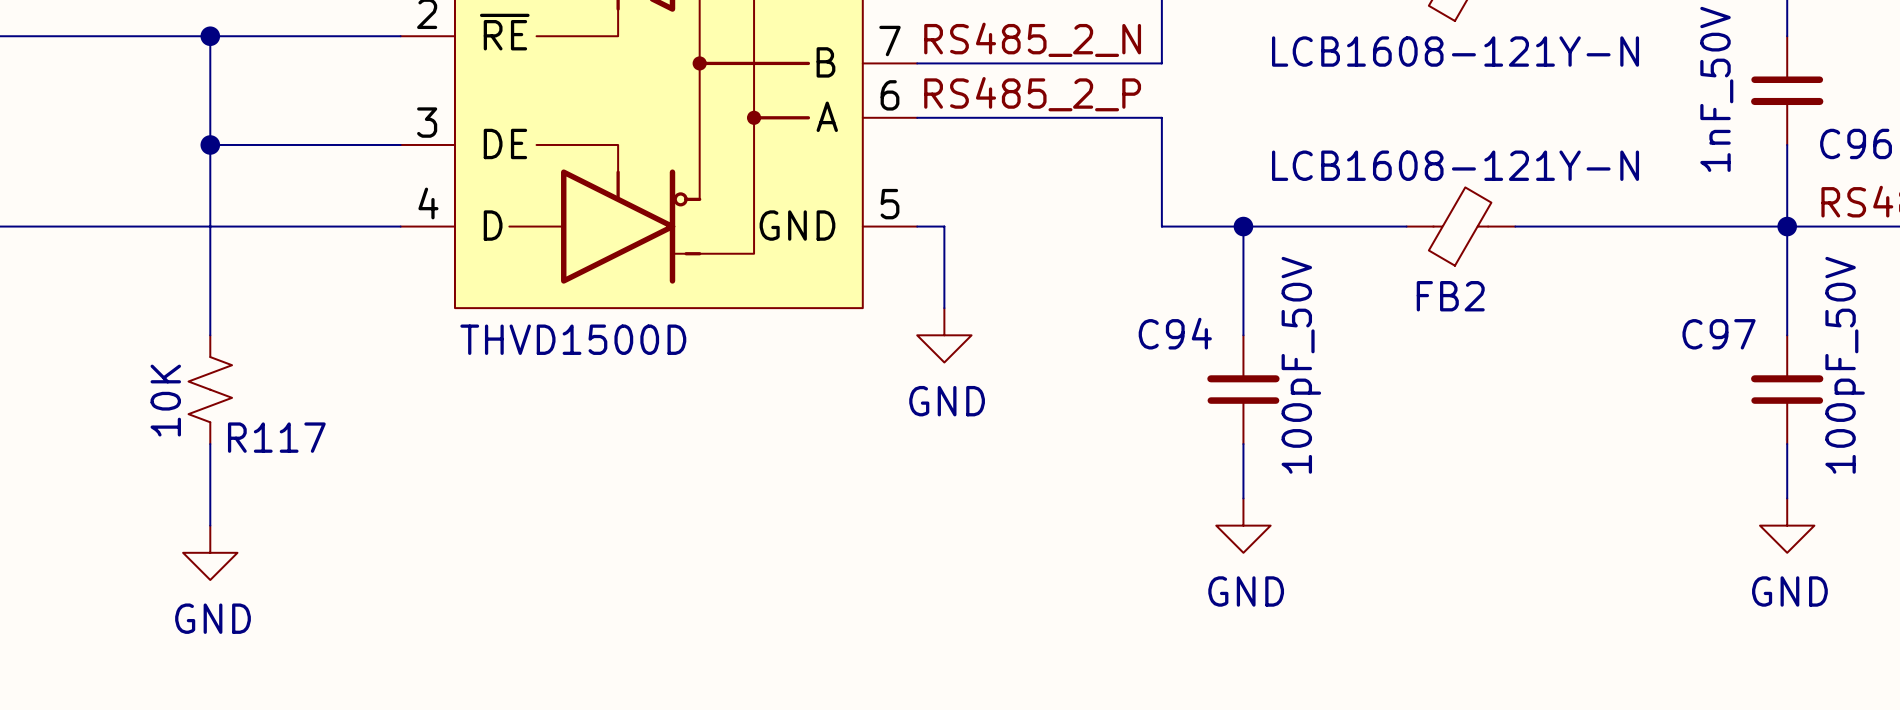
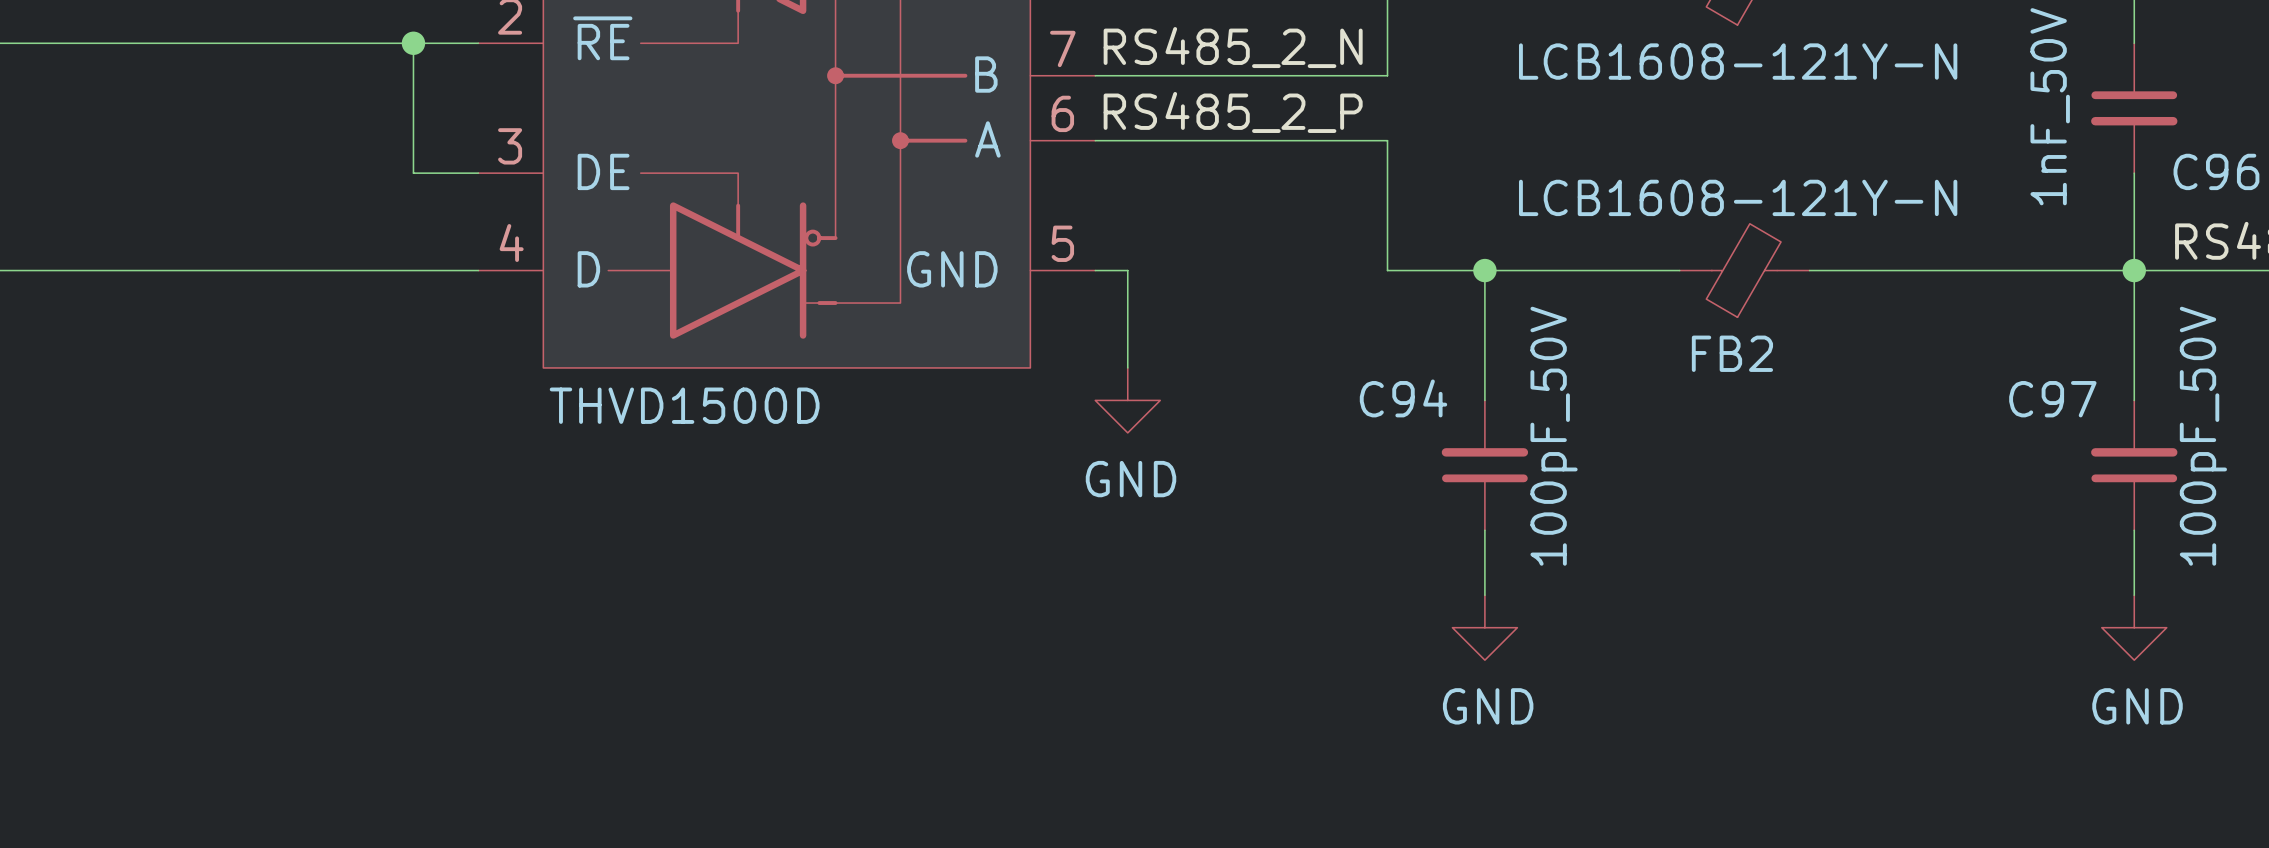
wire: (210, 36) (210, 335) -> none
junction: (210, 36) -> none
junction: none -> (413, 43)
wire: (210, 144) (346, 144) -> (413, 43) (413, 173)
junction: (210, 144) -> none
R117: 10K (210, 389) -> none
wire: (210, 444) (210, 525) -> none
power symbol: GND (210, 552) -> none

